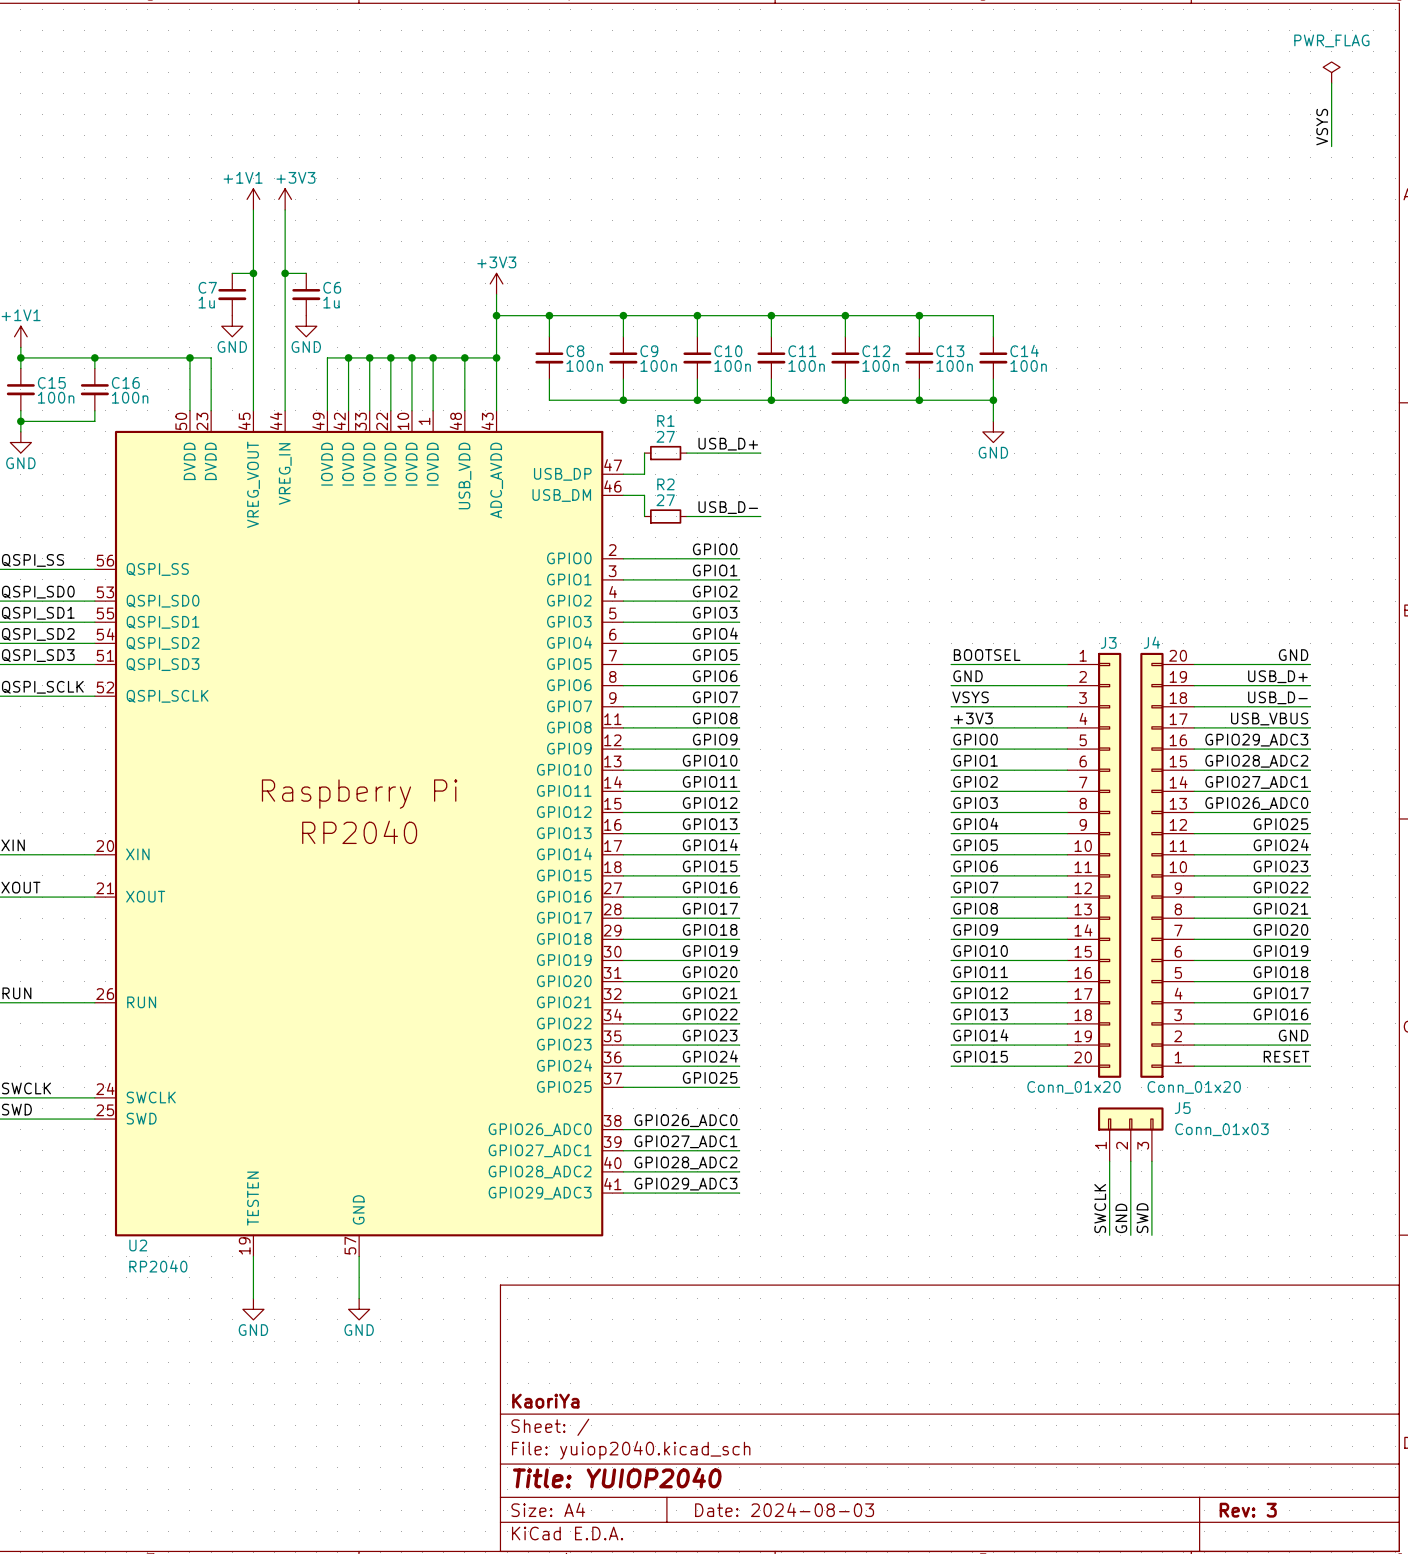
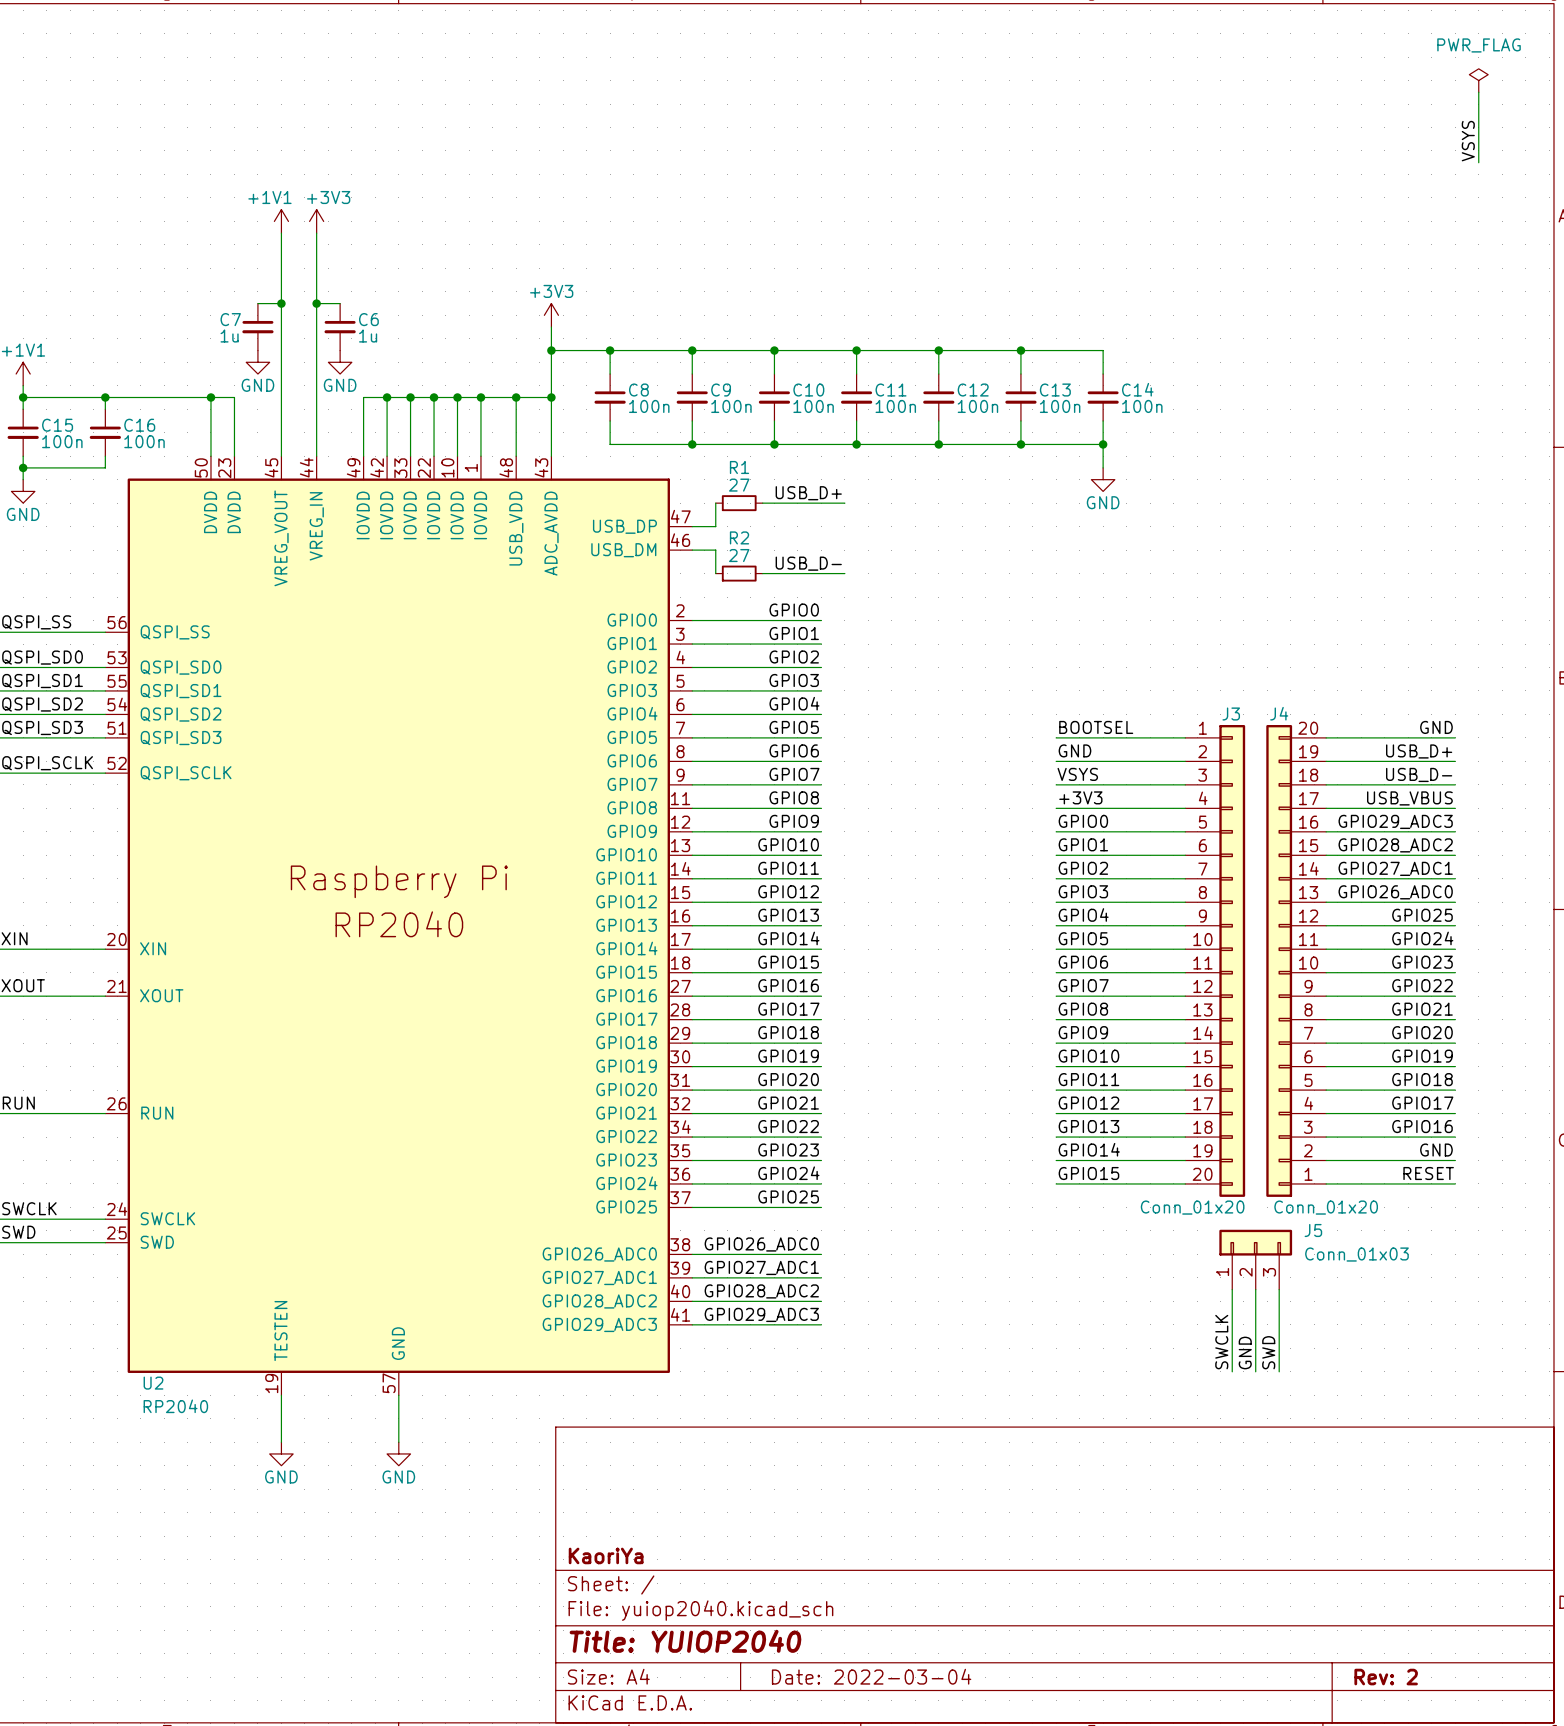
title block: Date: 2024-08-03 (784, 1509) -> Date: 2022-03-04 (871, 1676)
title block: Rev: 3 (1248, 1510) -> Rev: 2 (1386, 1677)

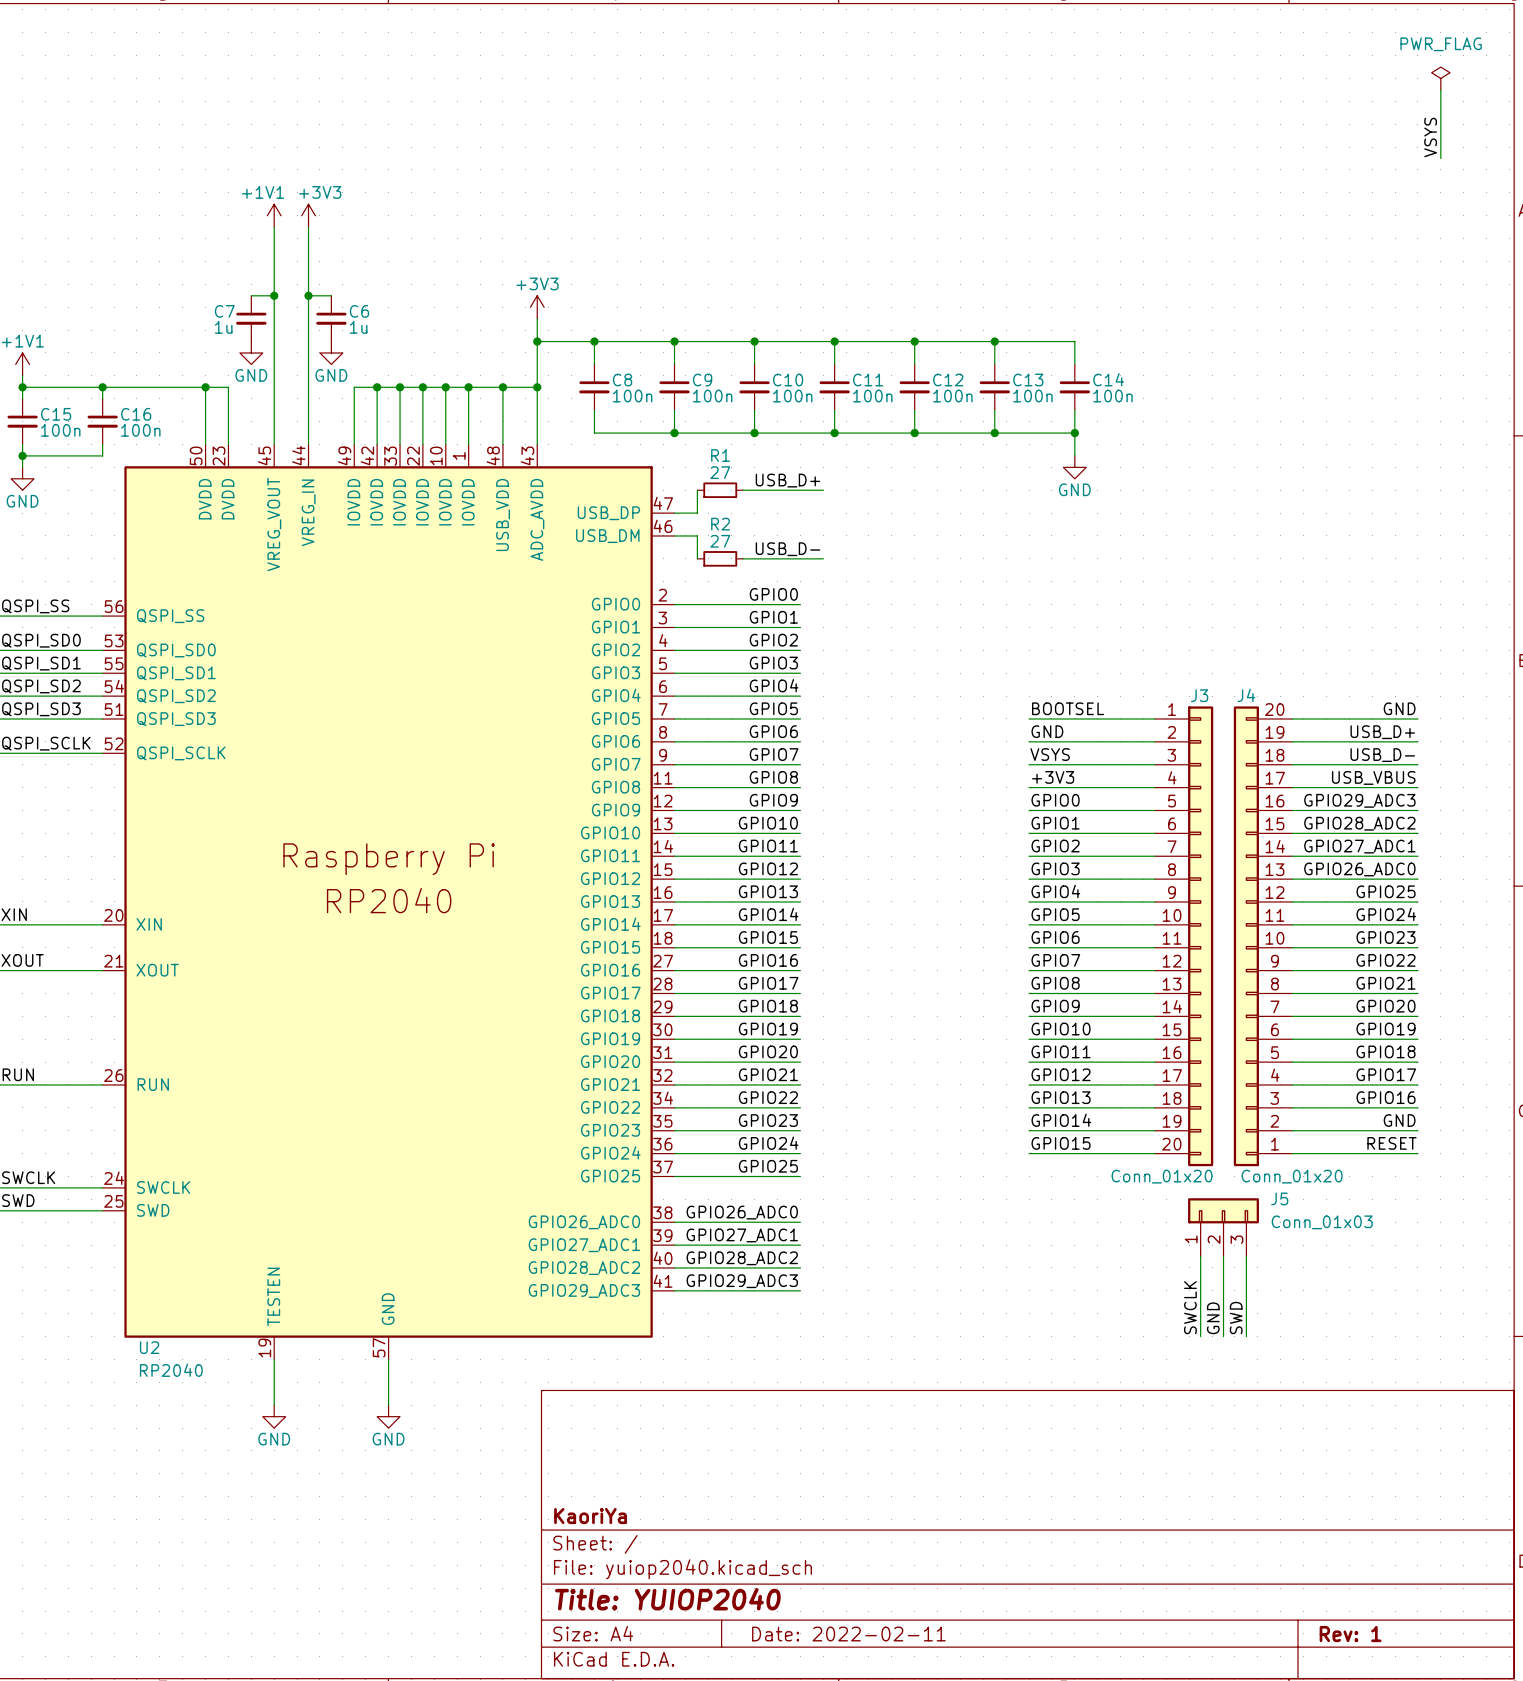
title block: Date: 2022-03-04 (871, 1676) -> Date: 2022-02-11 (848, 1634)
title block: Rev: 2 (1386, 1677) -> Rev: 1 (1350, 1634)

